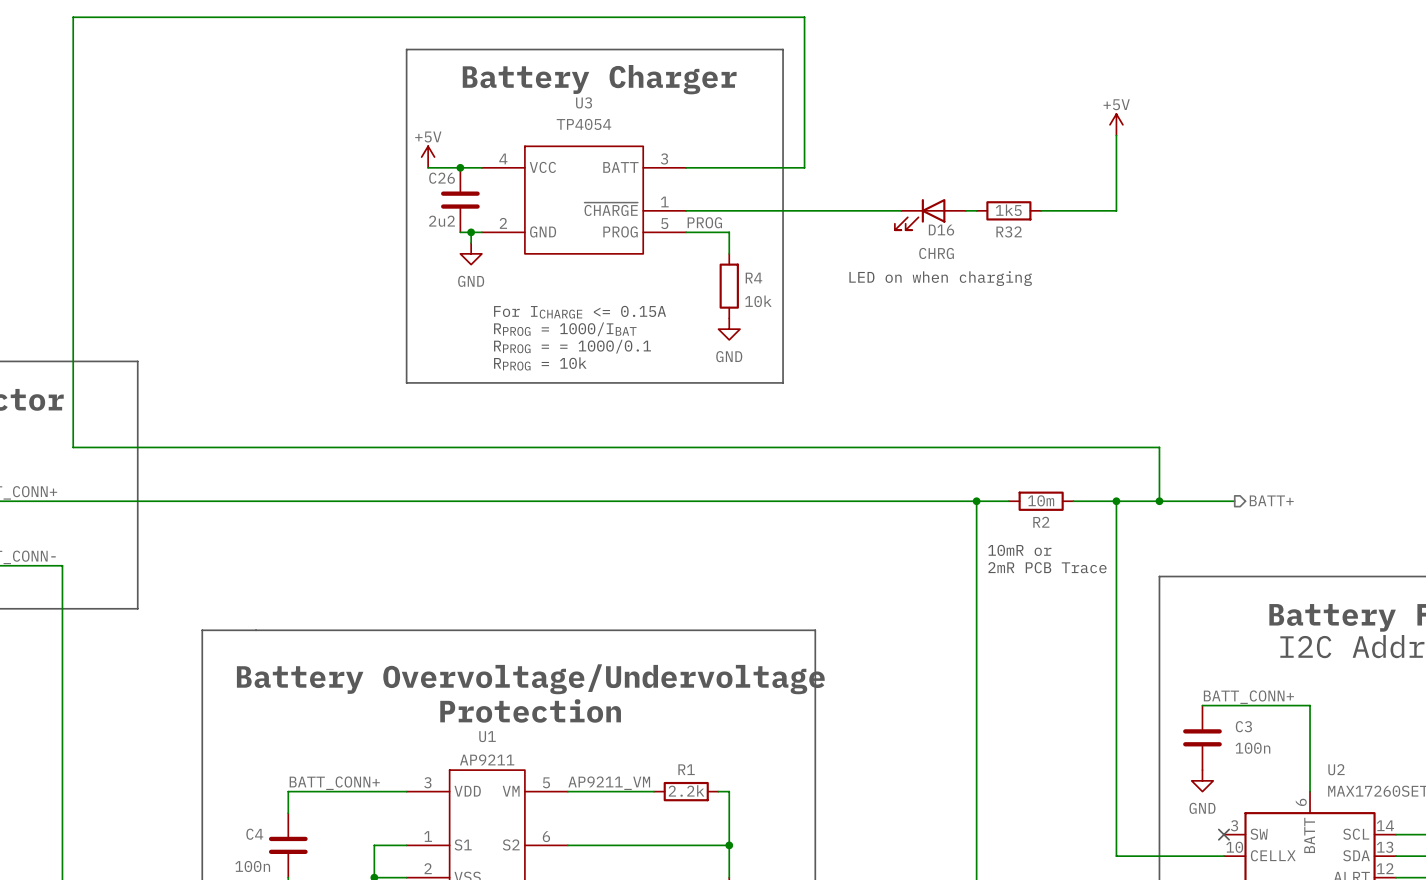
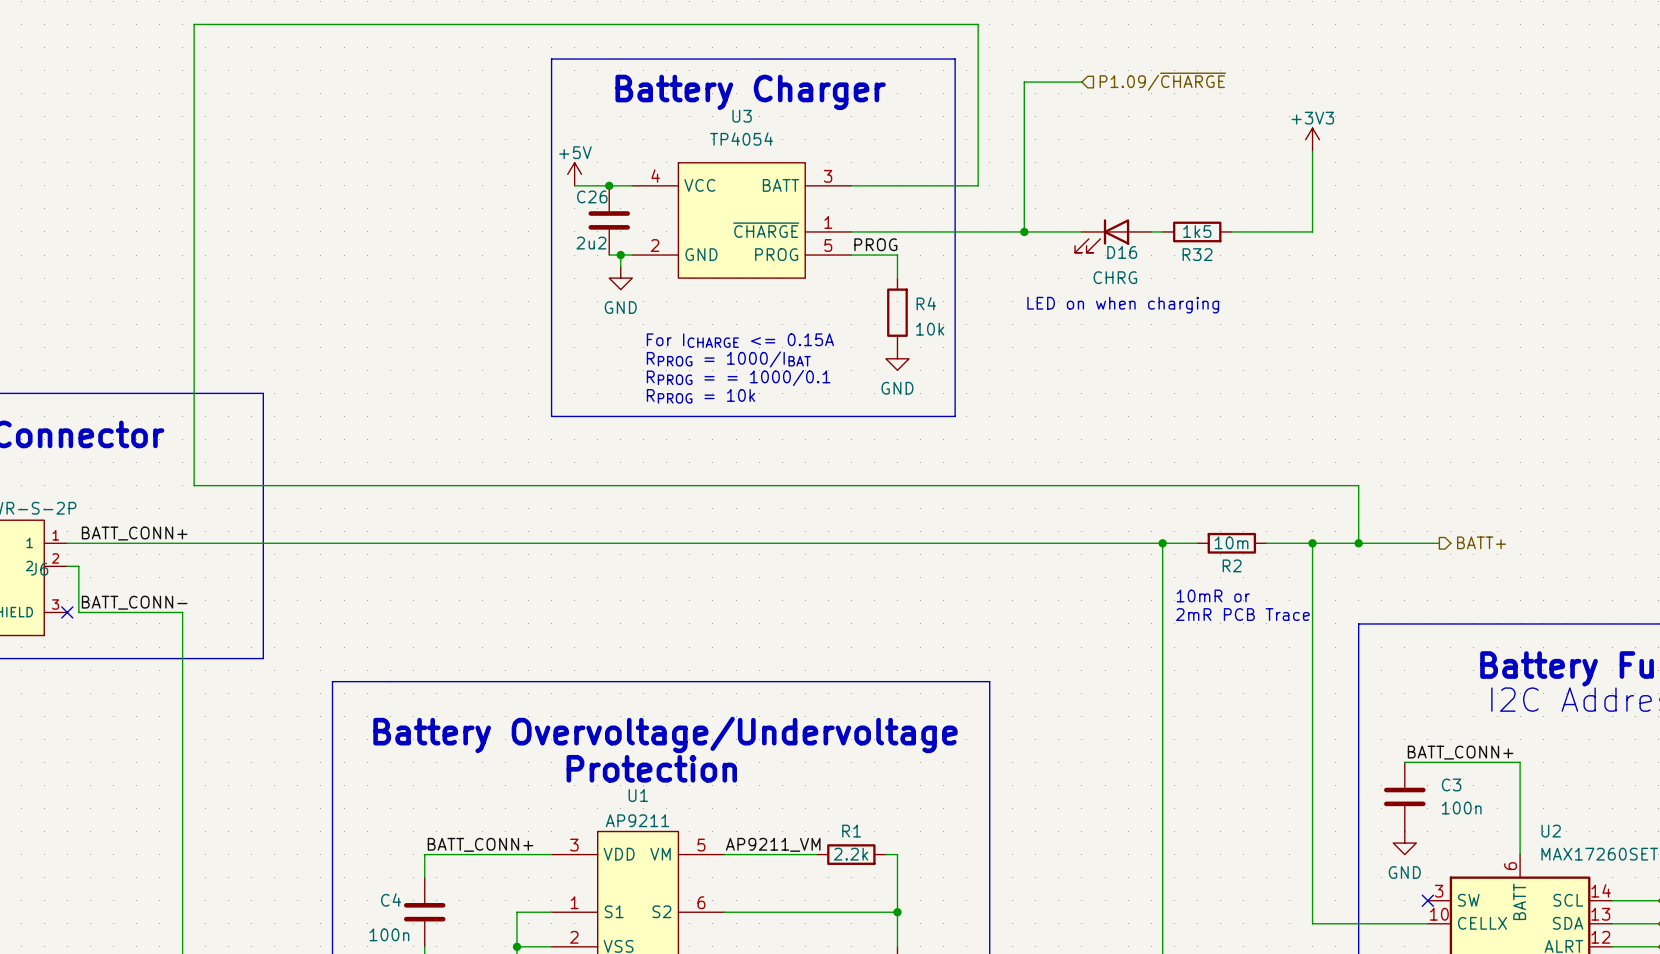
hierarchical label: none -> P1.09/~{CHARGE} (1162, 81)
wire: none -> (1081, 82) (1024, 82) (1024, 231)
power symbol: +5V (1116, 124) -> +3V3 (1312, 139)
junction: none -> (1024, 231)

